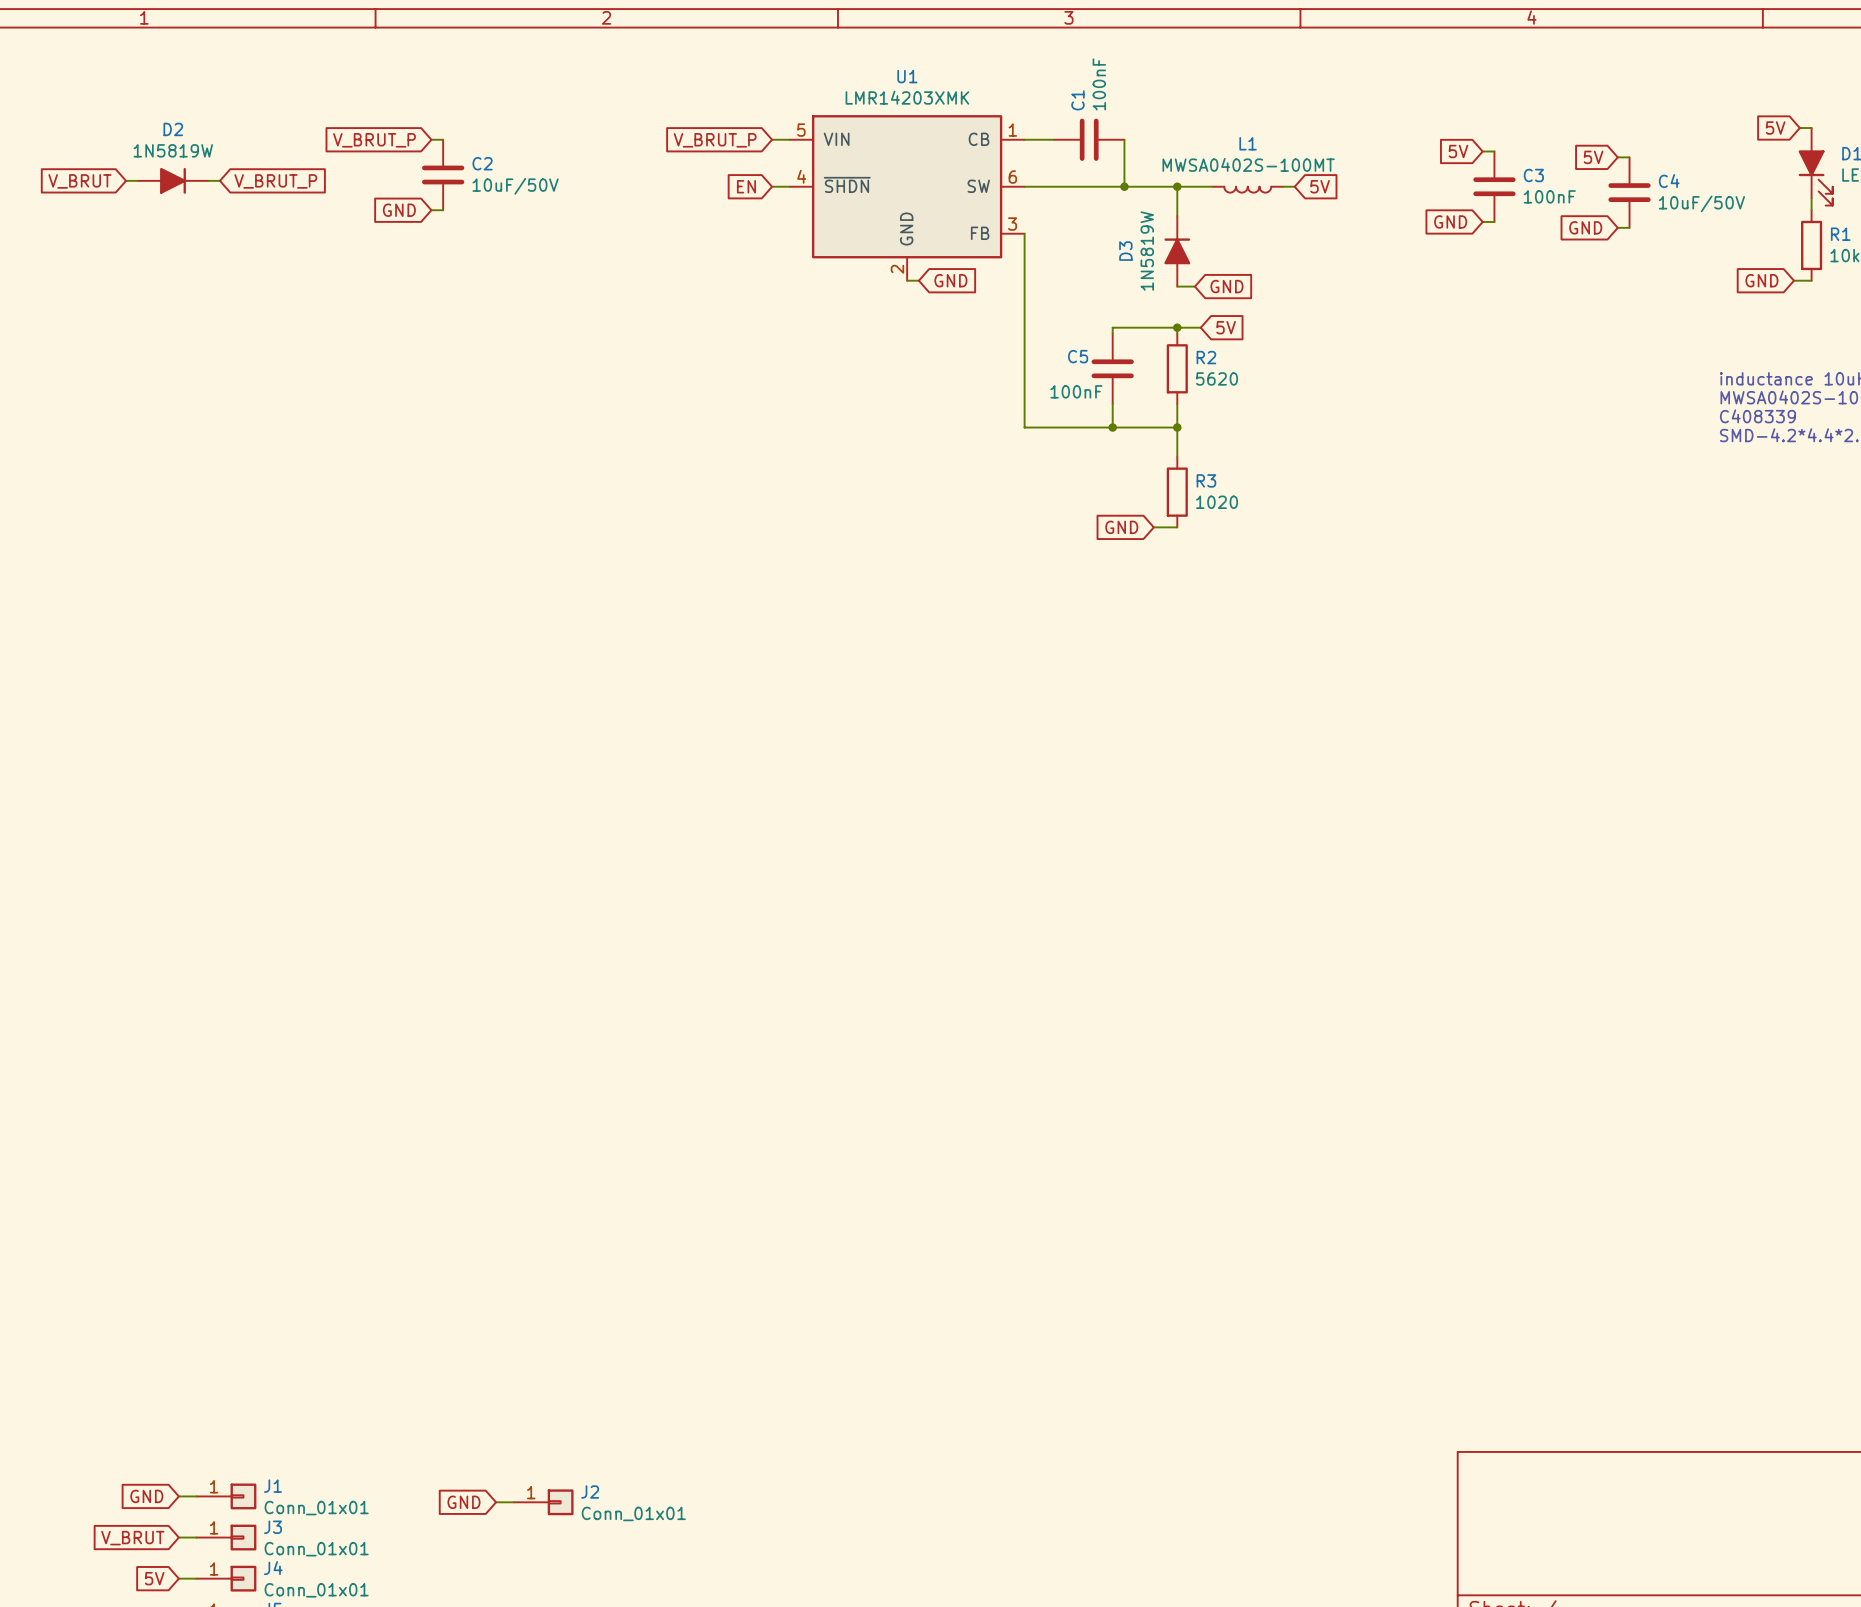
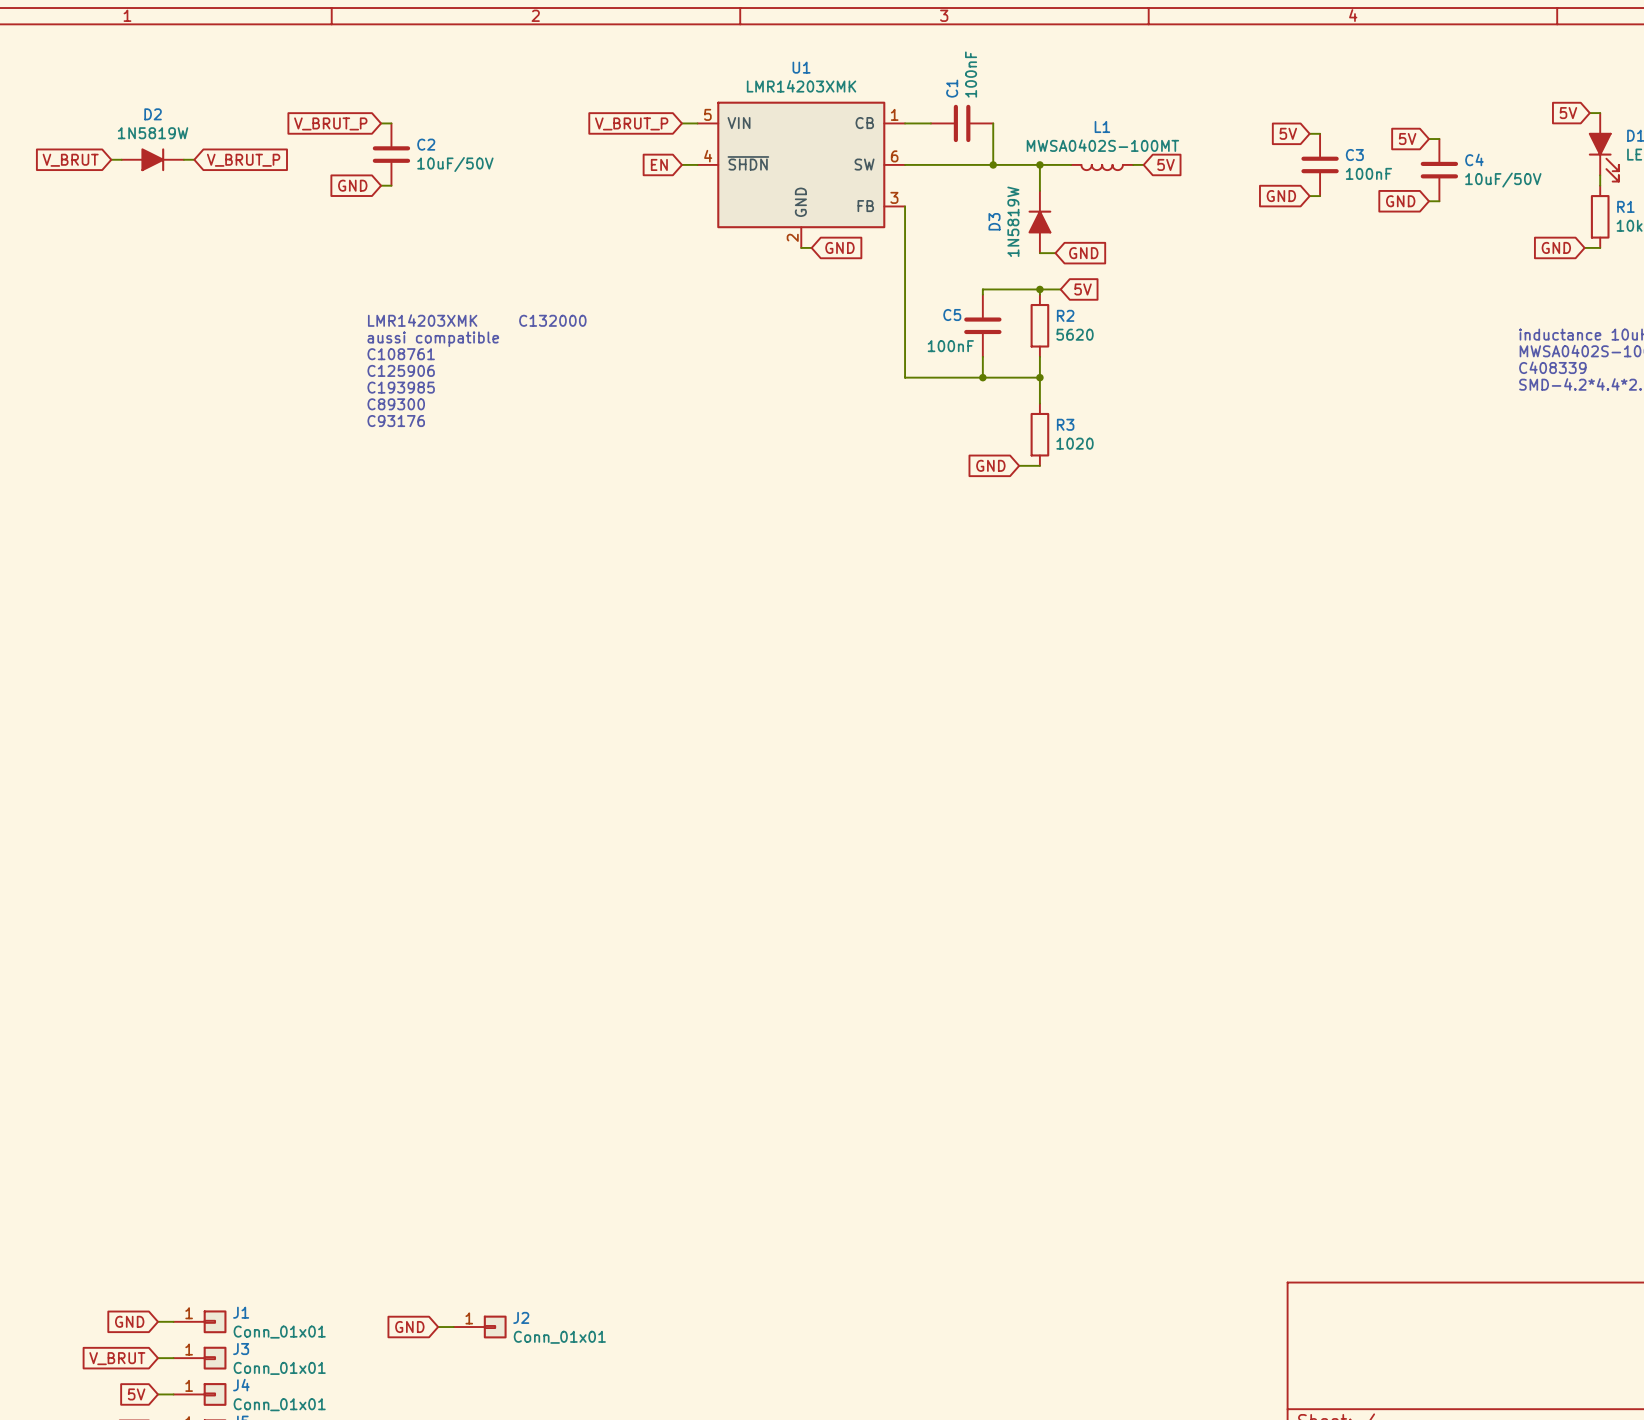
text: none -> LMR14203XMK C132000 (477, 320)
text: none -> aussi compatible (433, 339)
text: none -> C108761 (401, 354)
text: none -> C125906 (401, 370)
text: none -> C193985 (401, 387)
text: none -> C89300 (396, 404)
text: none -> C93176 (396, 421)

